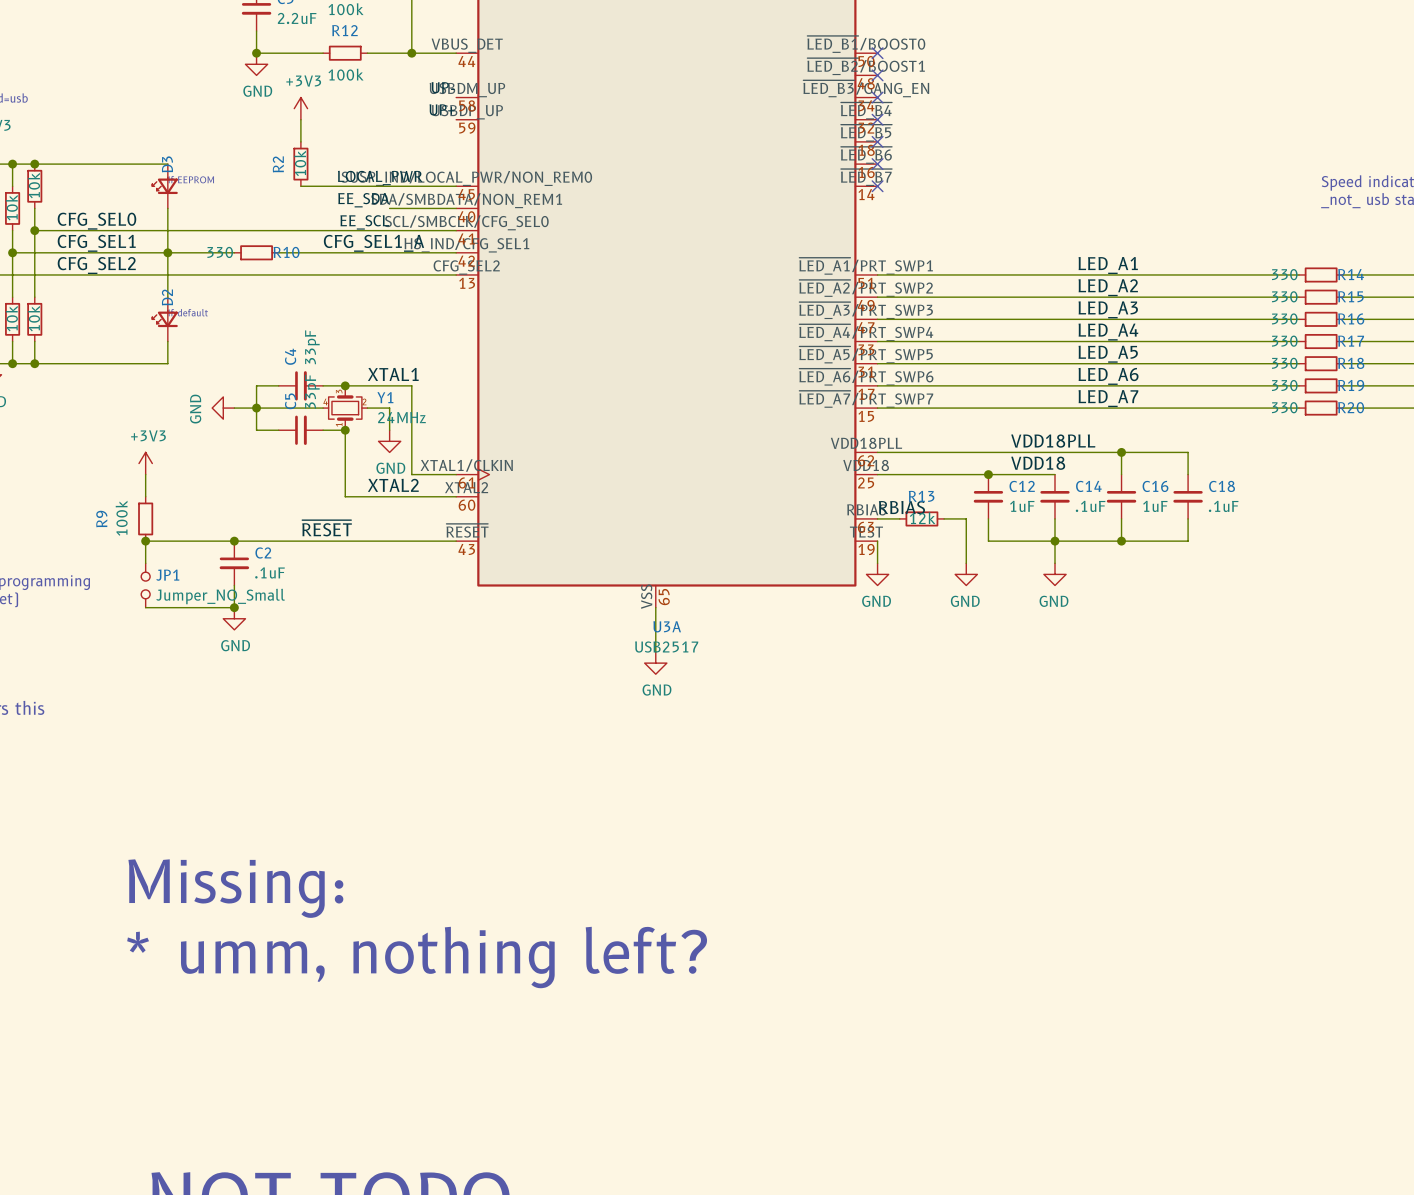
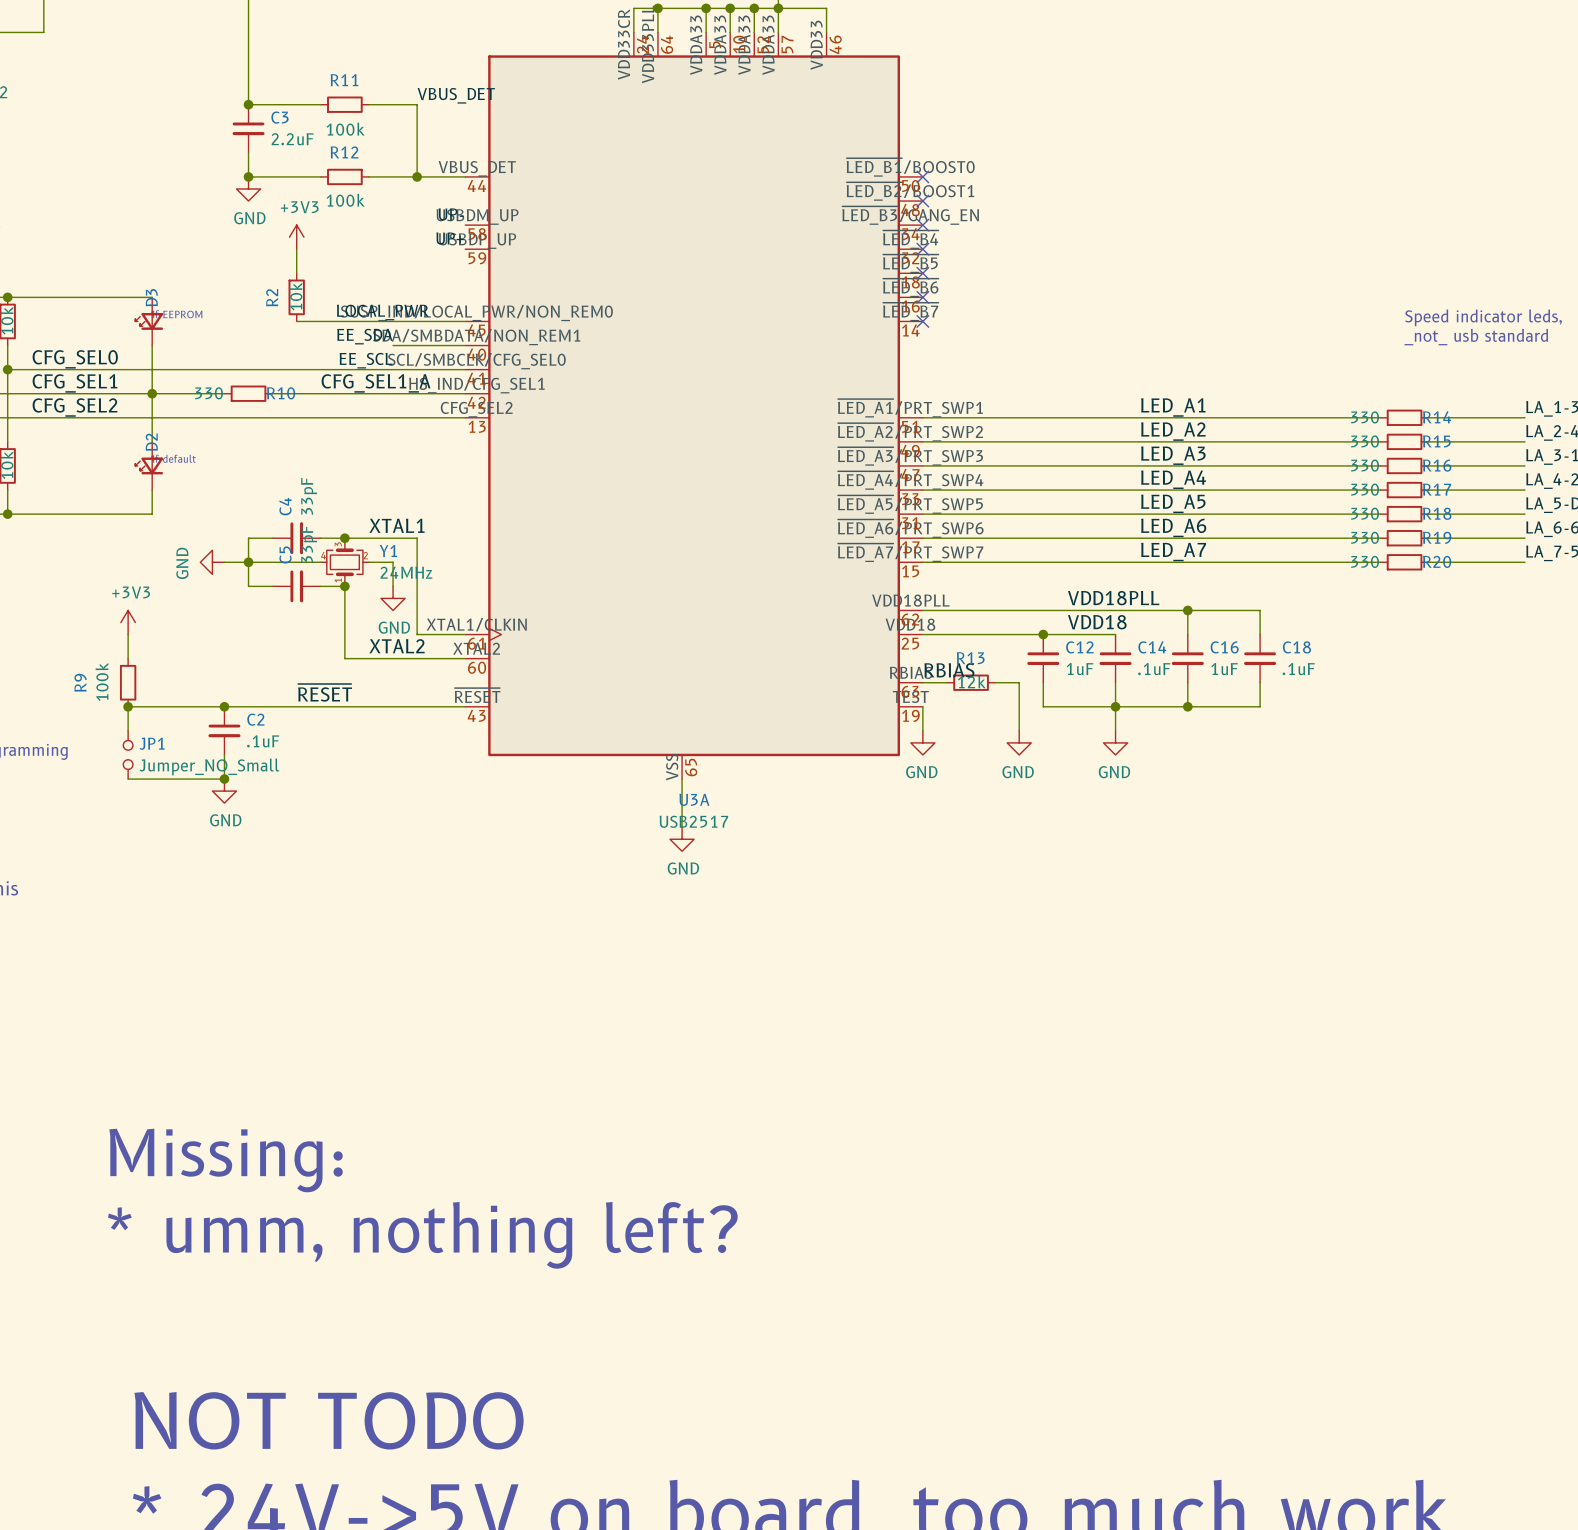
text: Missing: (235, 888) -> none
text: * umm, nothing left? (417, 957) -> Missing: (226, 1160)
text: none -> * umm, nothing left? (422, 1235)

